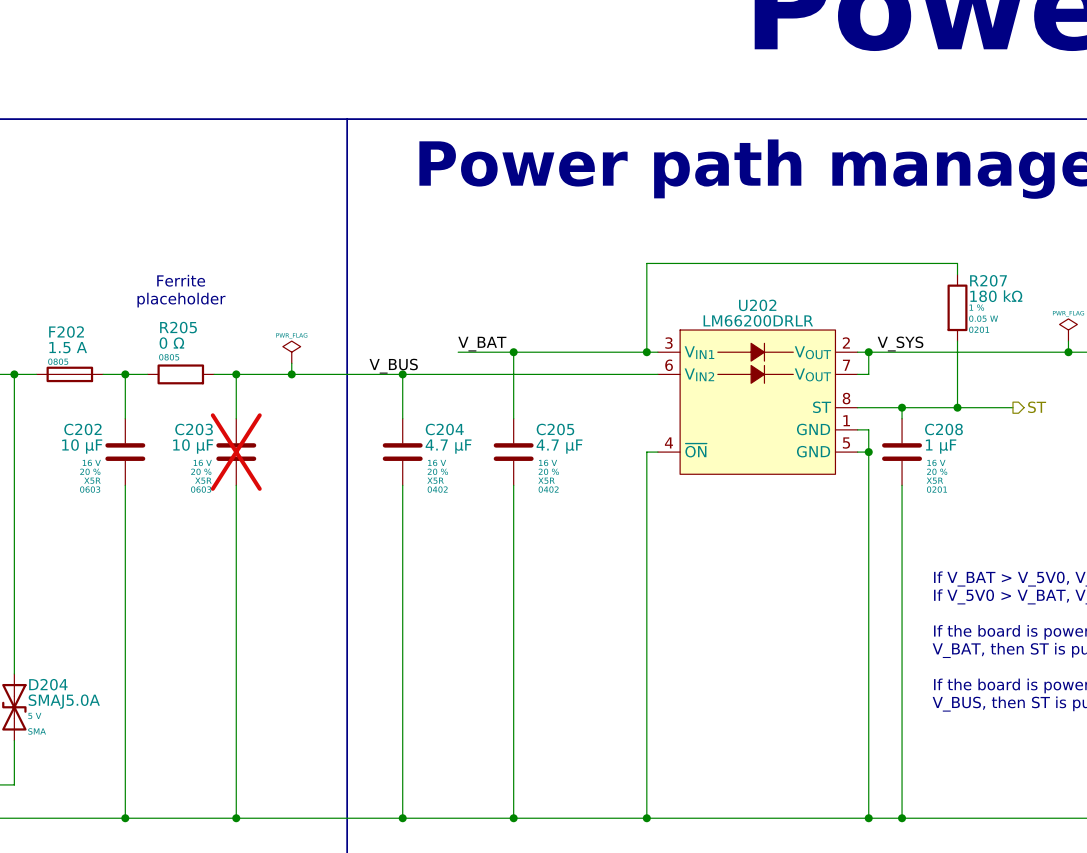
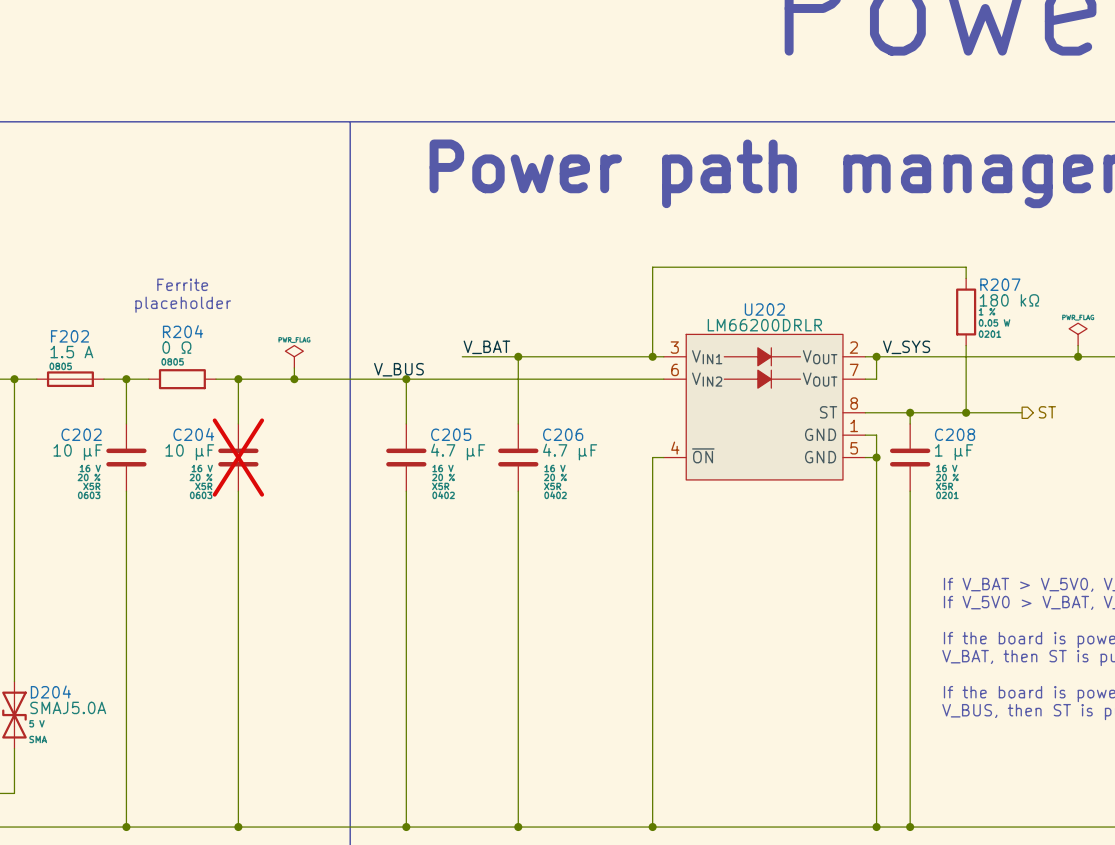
R205 name: R205 (178, 327) -> R204 (183, 331)
C203 name: C203 (194, 429) -> C204 (193, 434)
C204 name: C204 (444, 429) -> C205 (451, 434)
C205 name: C205 (555, 429) -> C206 (563, 434)

